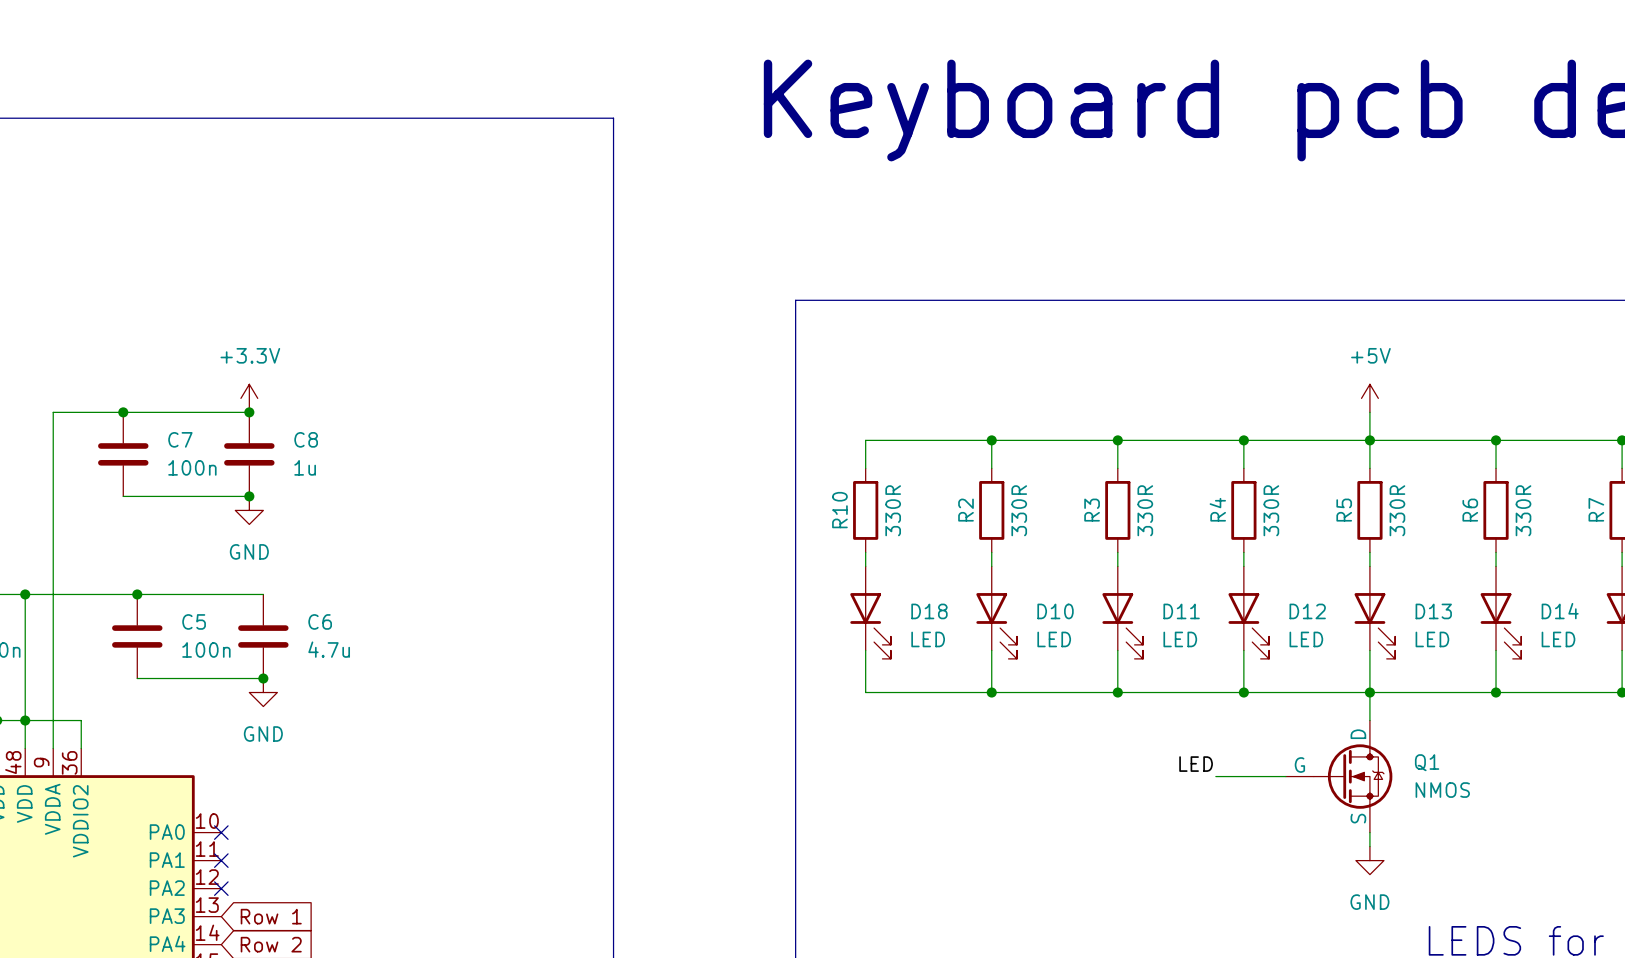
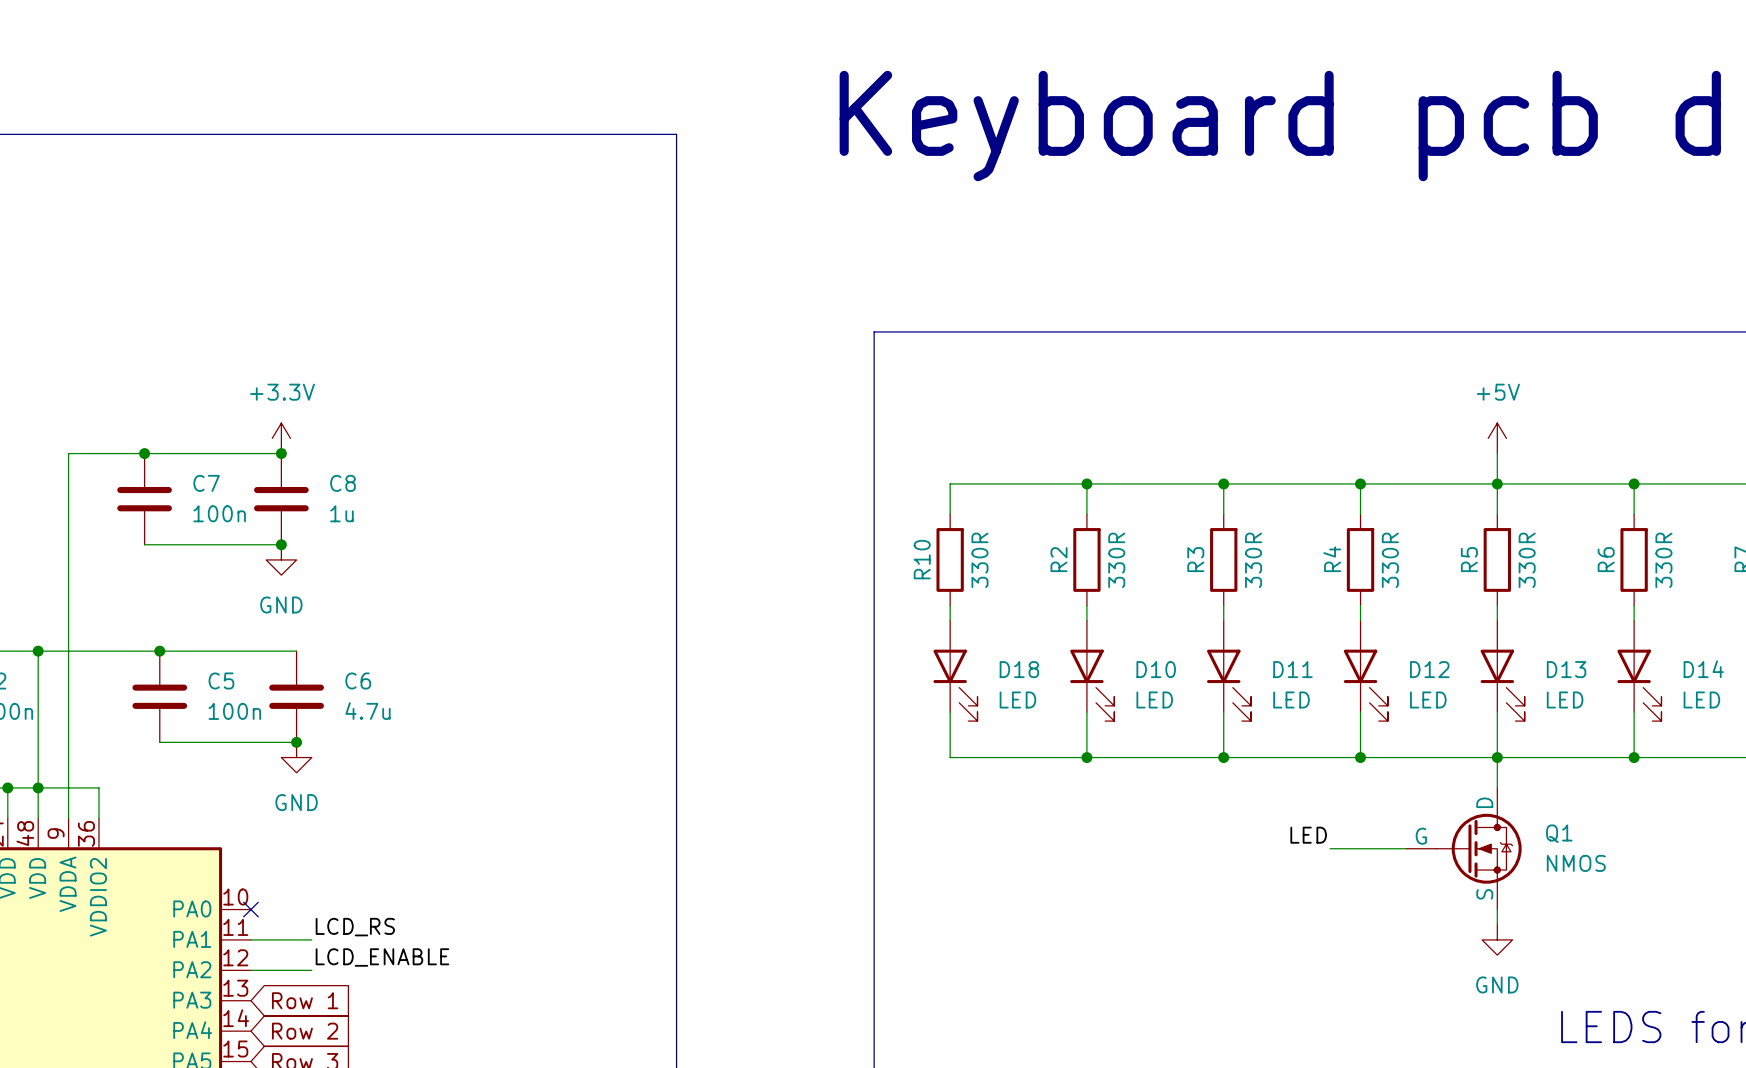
label: none -> LCD_RS (355, 927)
wire: none -> (250, 939) (311, 939)
no-connect mark: (221, 860) -> none
label: none -> LCD_ENABLE (382, 957)
wire: none -> (250, 970) (311, 970)
no-connect mark: (221, 888) -> none

